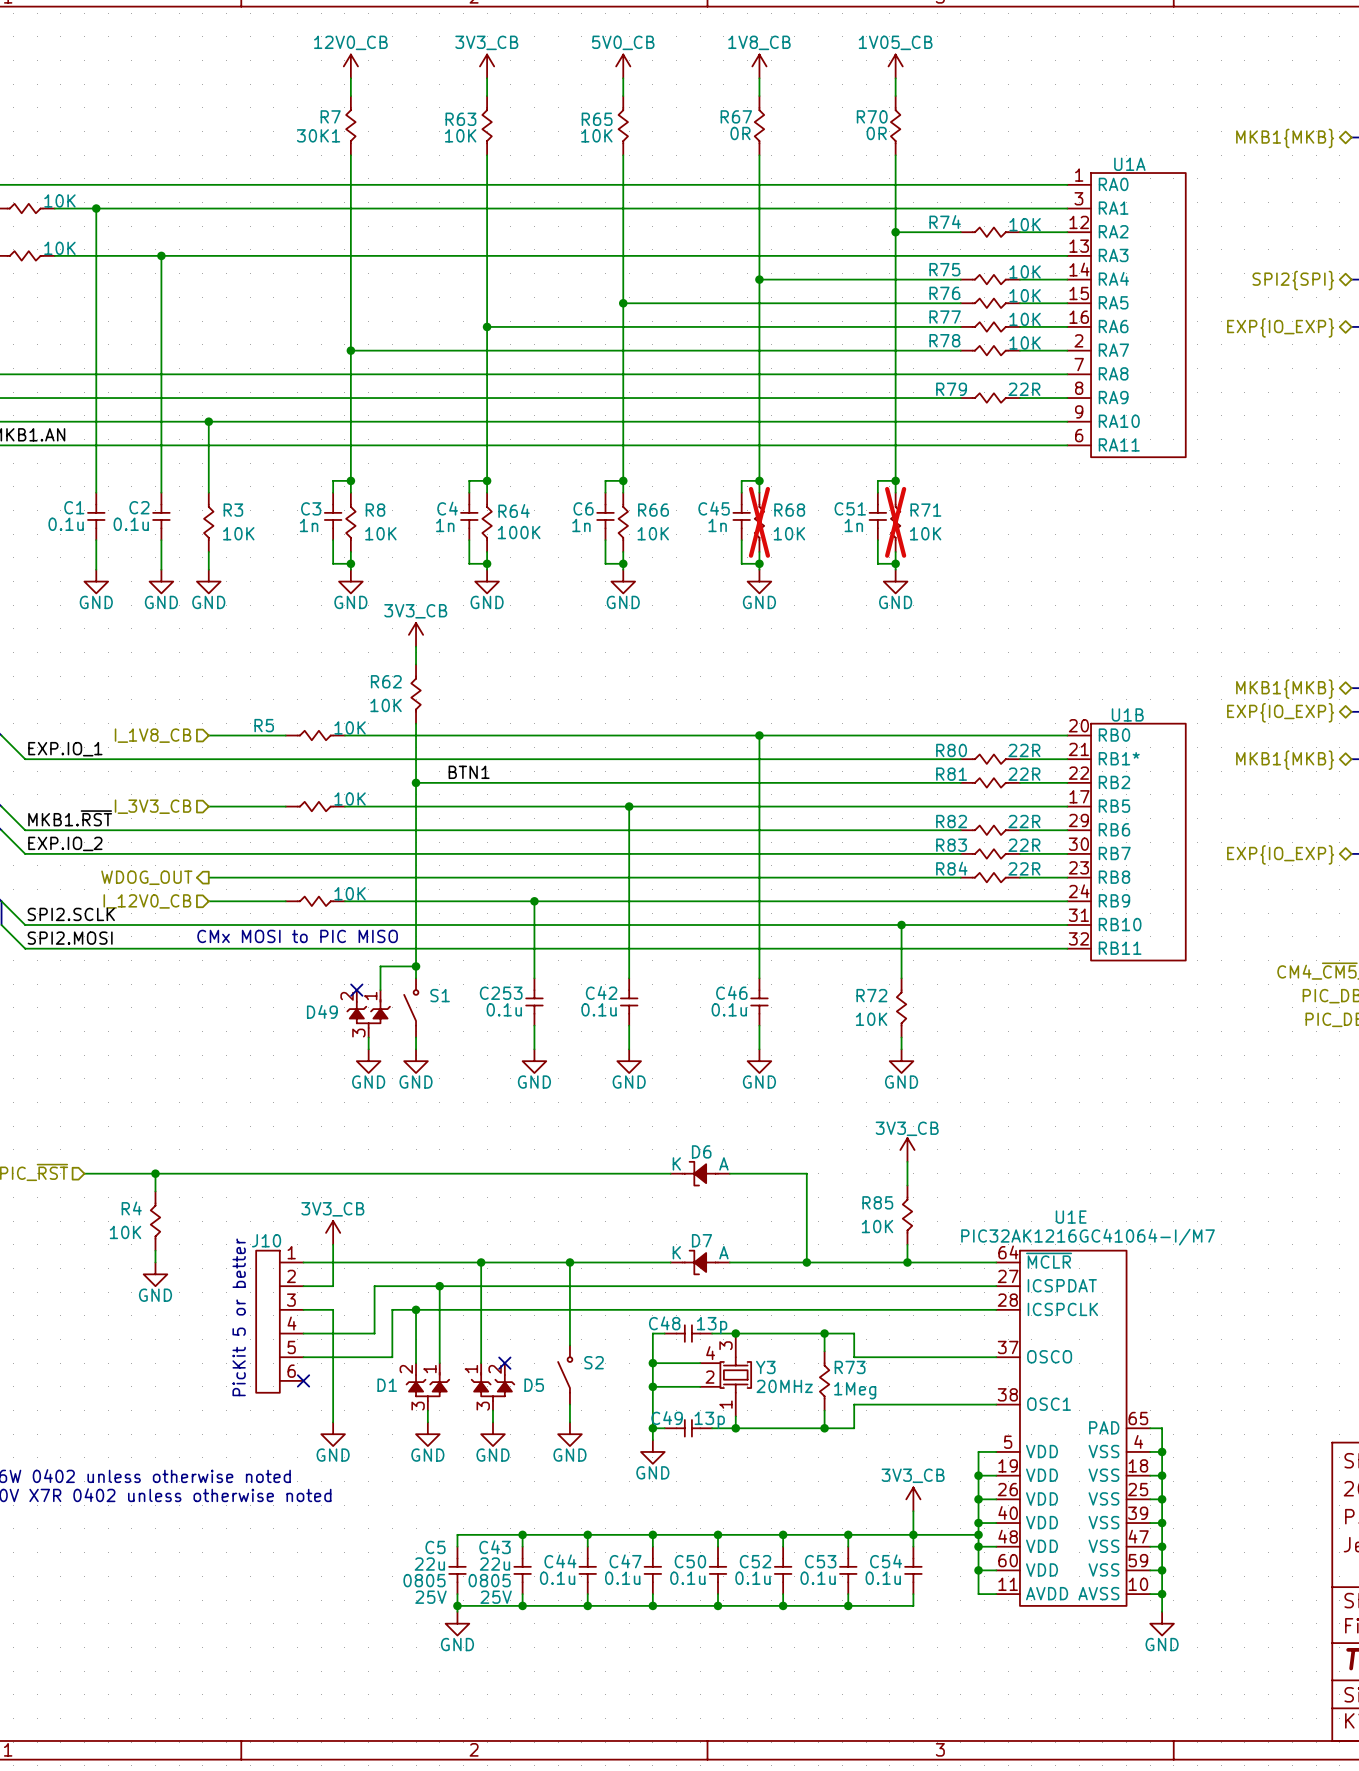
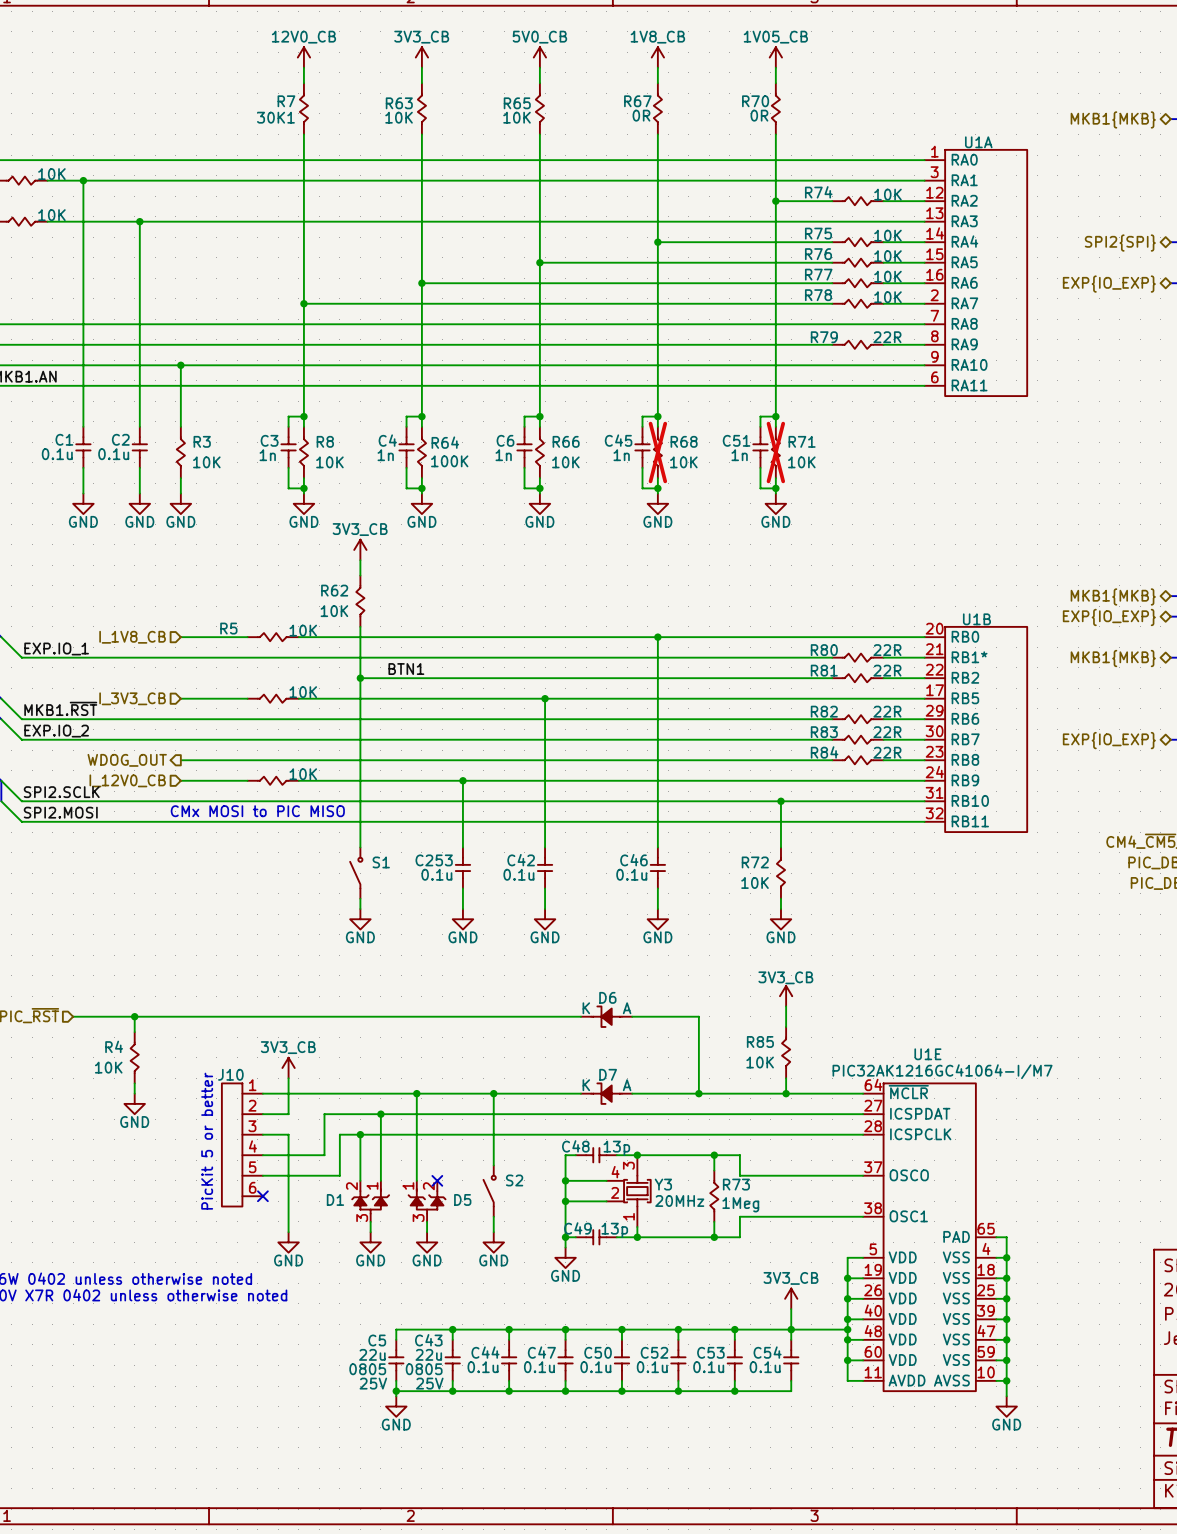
wire: (416, 966) (380, 966) (380, 990) -> none
junction: (416, 966) -> none
no-connect mark: (356, 990) -> none
D49: (368, 1013) -> none
wire: (368, 1037) (368, 1049) -> none
power symbol: GND (368, 1061) -> none

